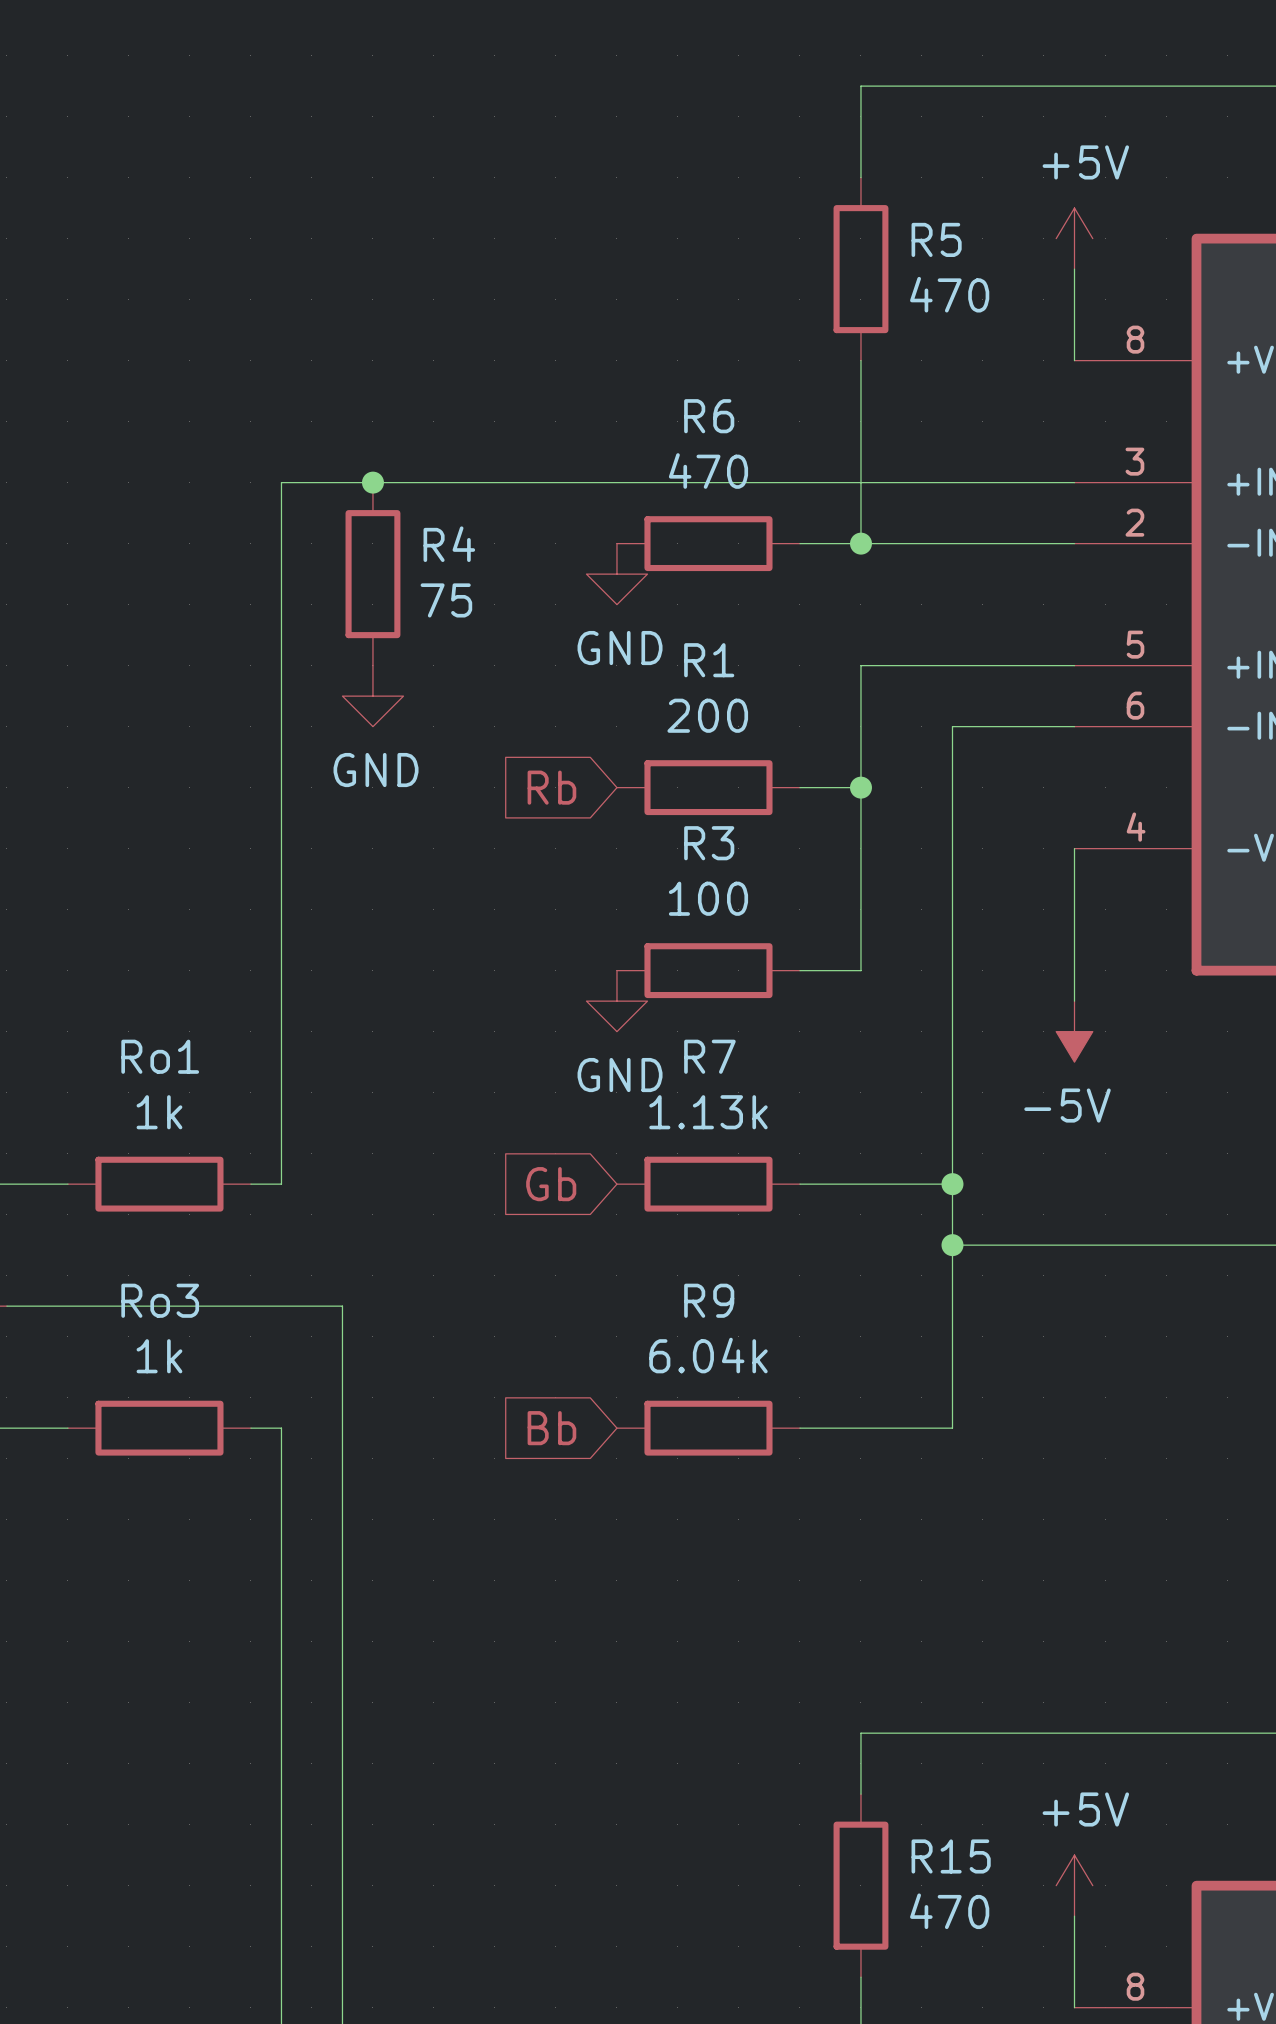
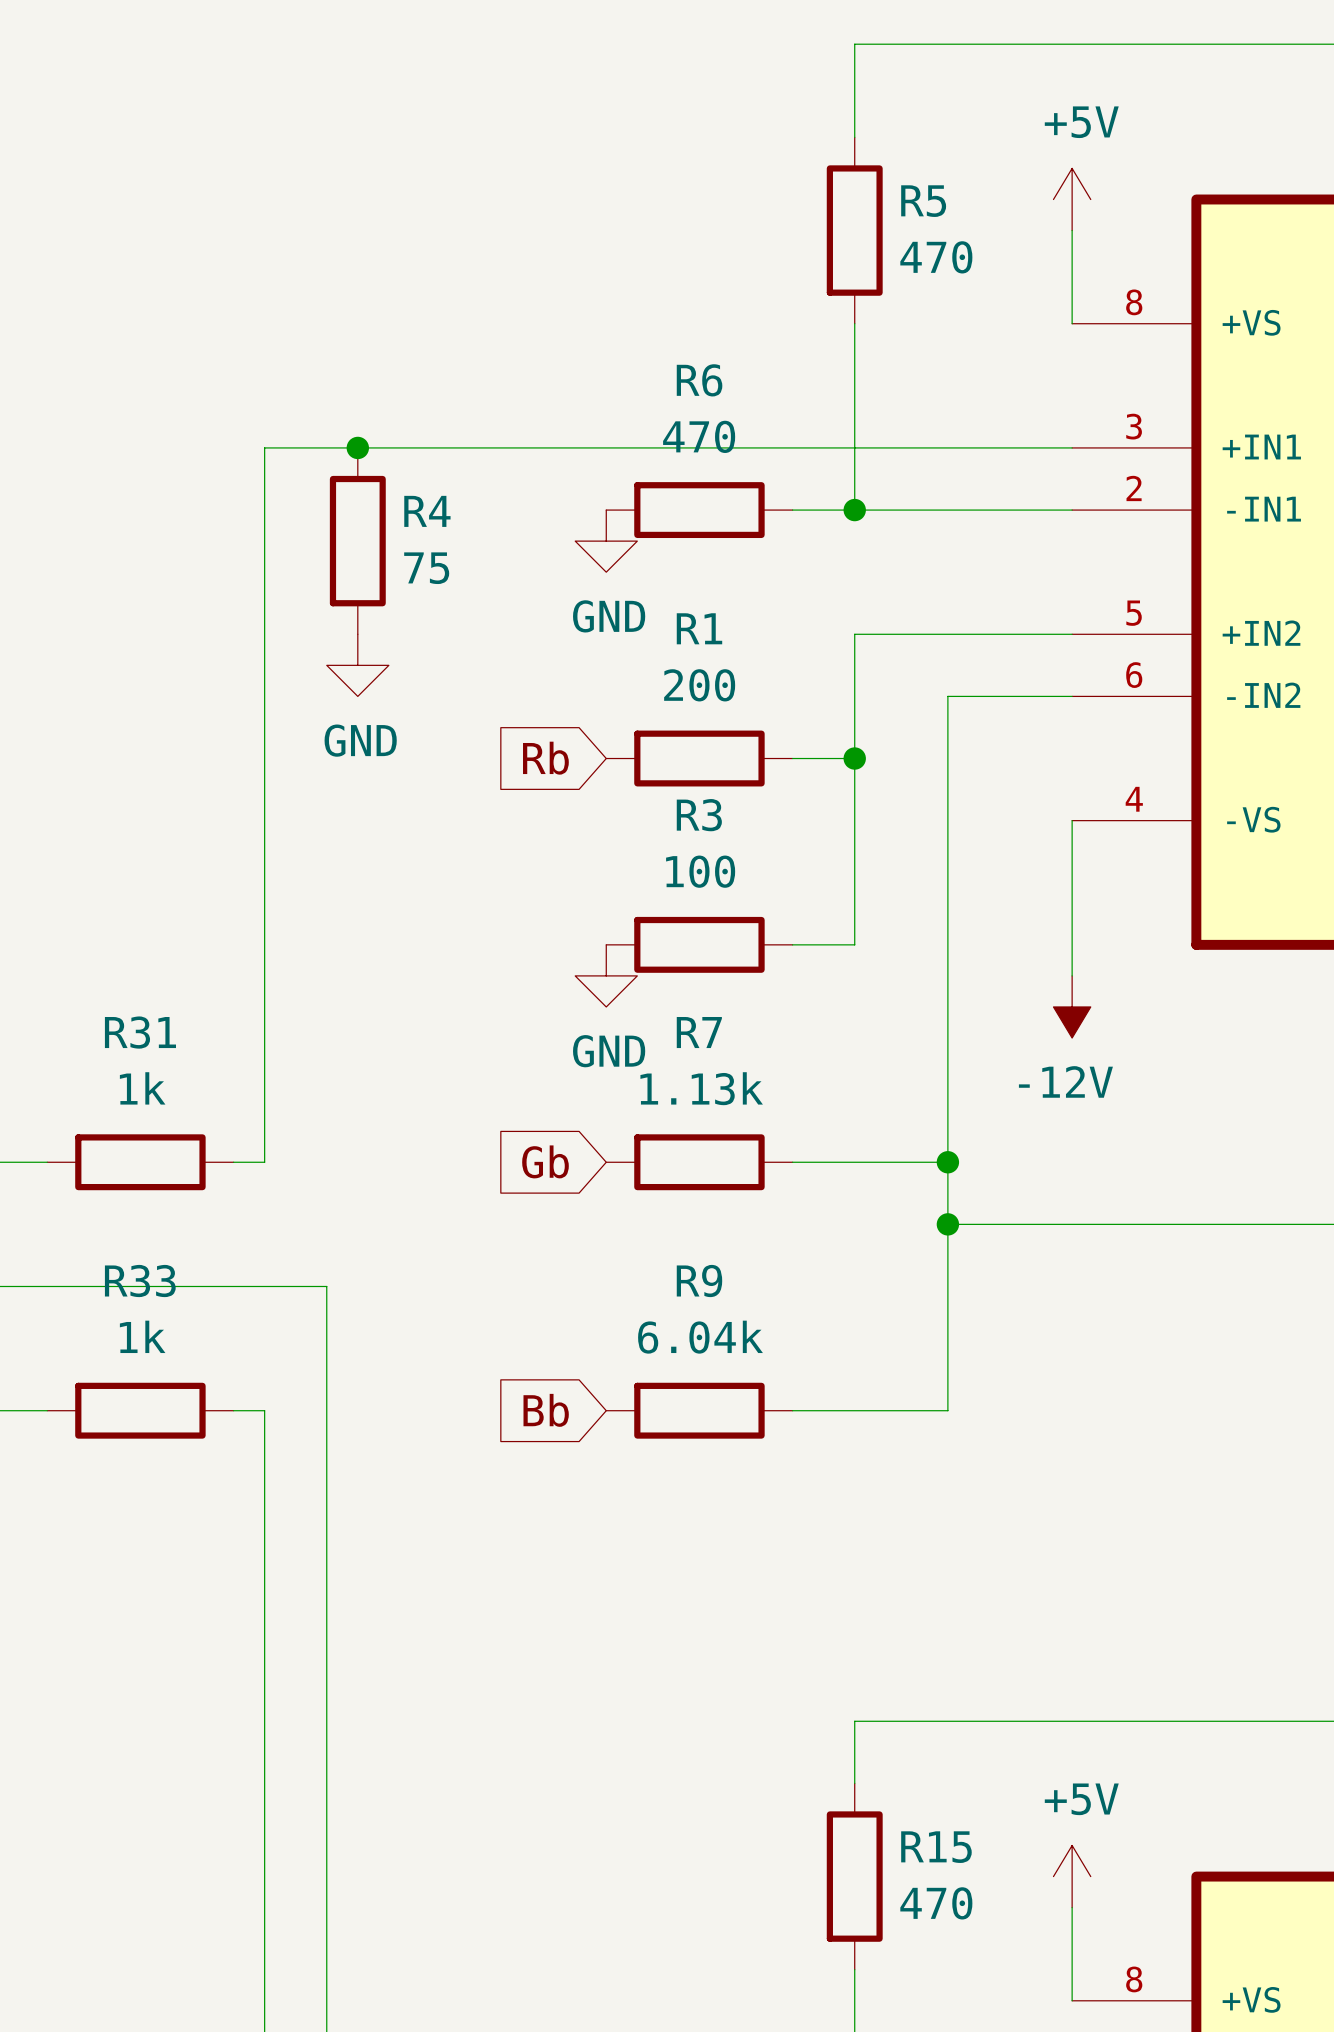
power symbol: -5V (1074, 1031) -> -12V (1072, 1006)
Ro1 name: Ro1 (160, 1056) -> R31 (140, 1032)
Ro3 name: Ro3 (160, 1300) -> R33 (140, 1281)

